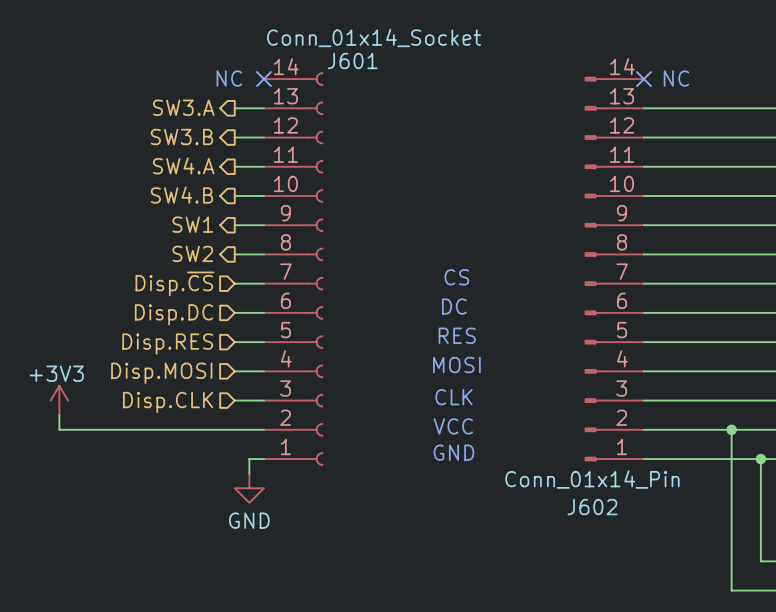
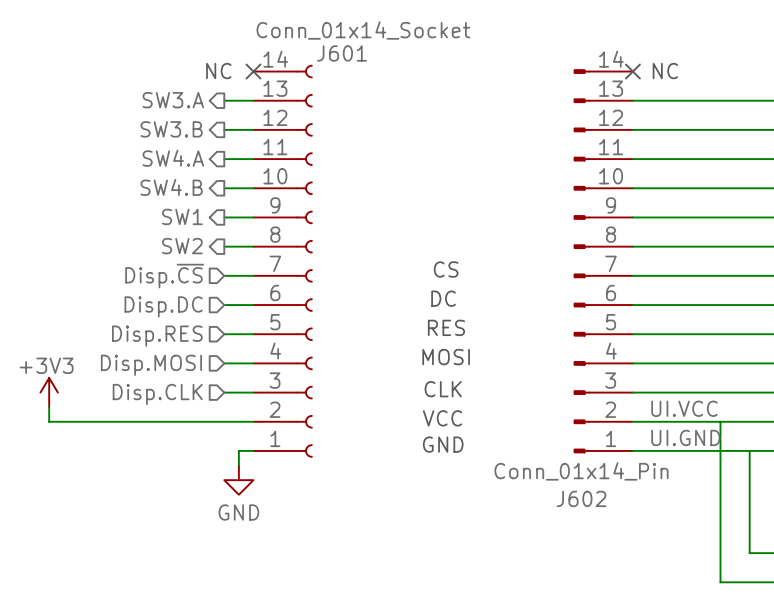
label: none -> UI.VCC (684, 408)
junction: (731, 429) -> none
label: none -> UI.GND (685, 437)
junction: (760, 459) -> none

